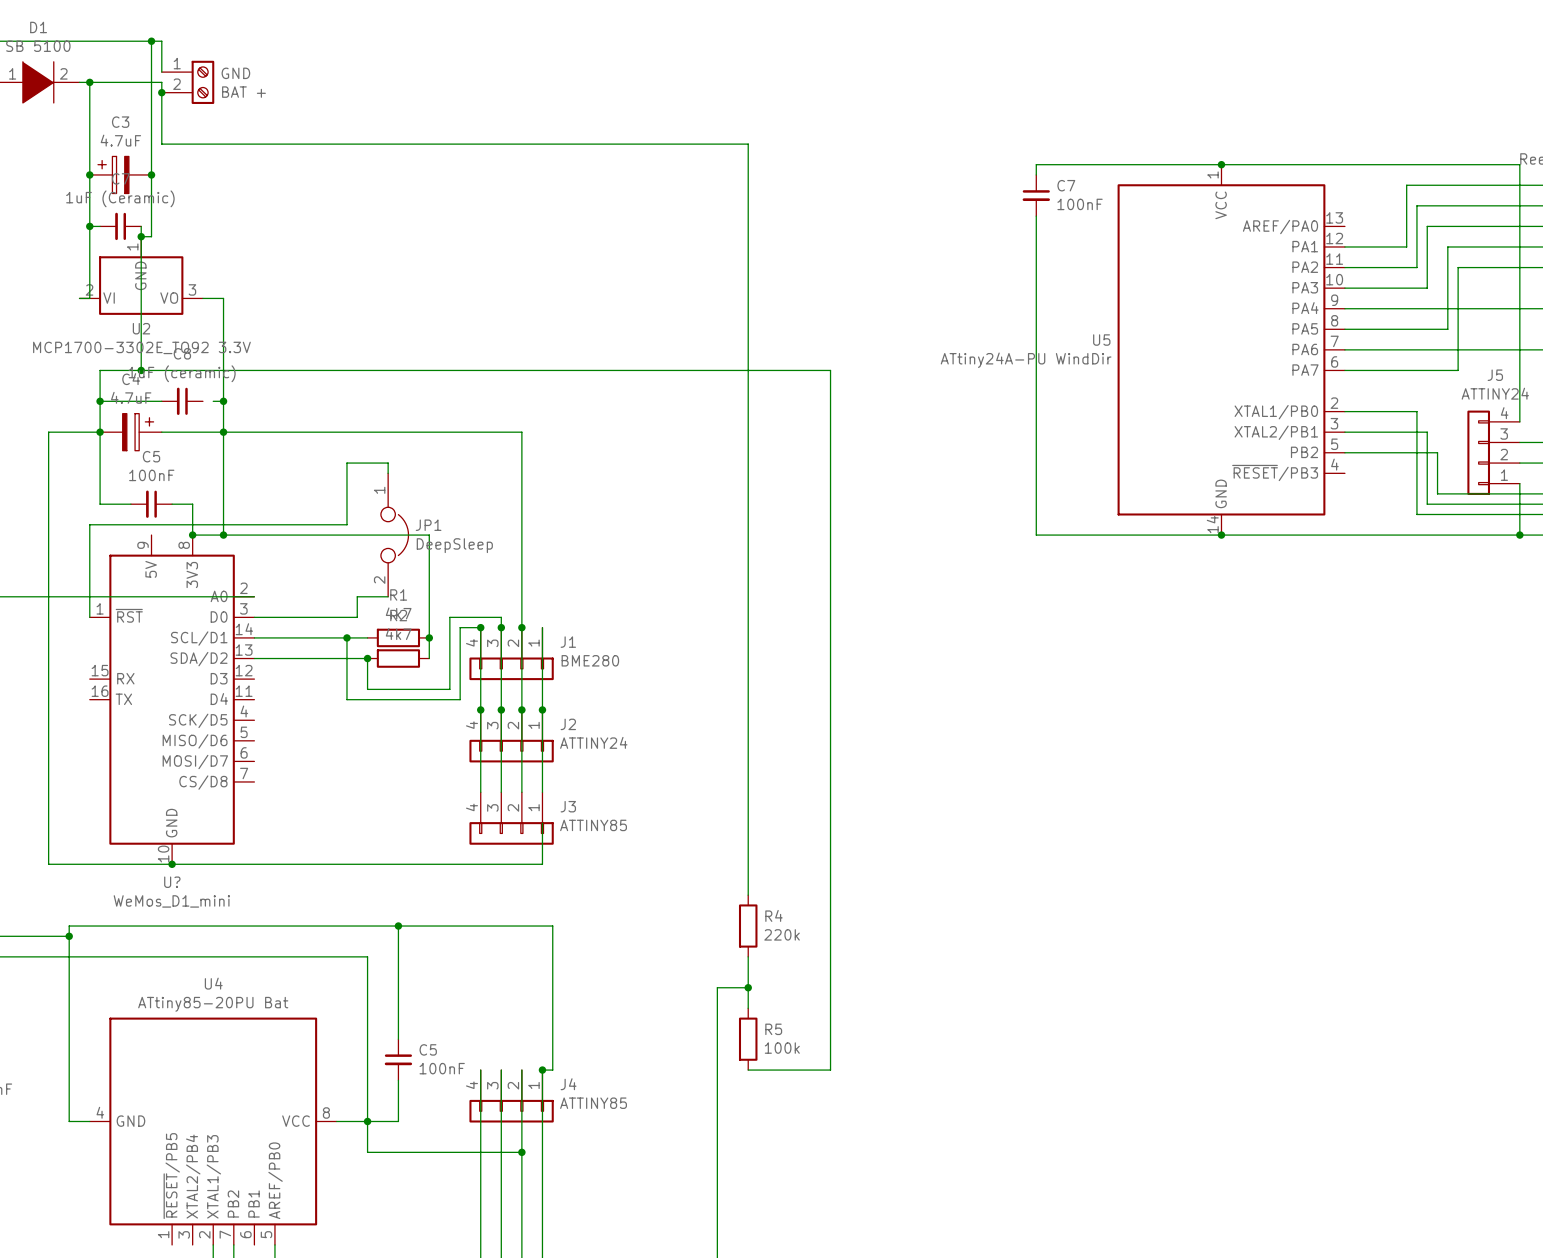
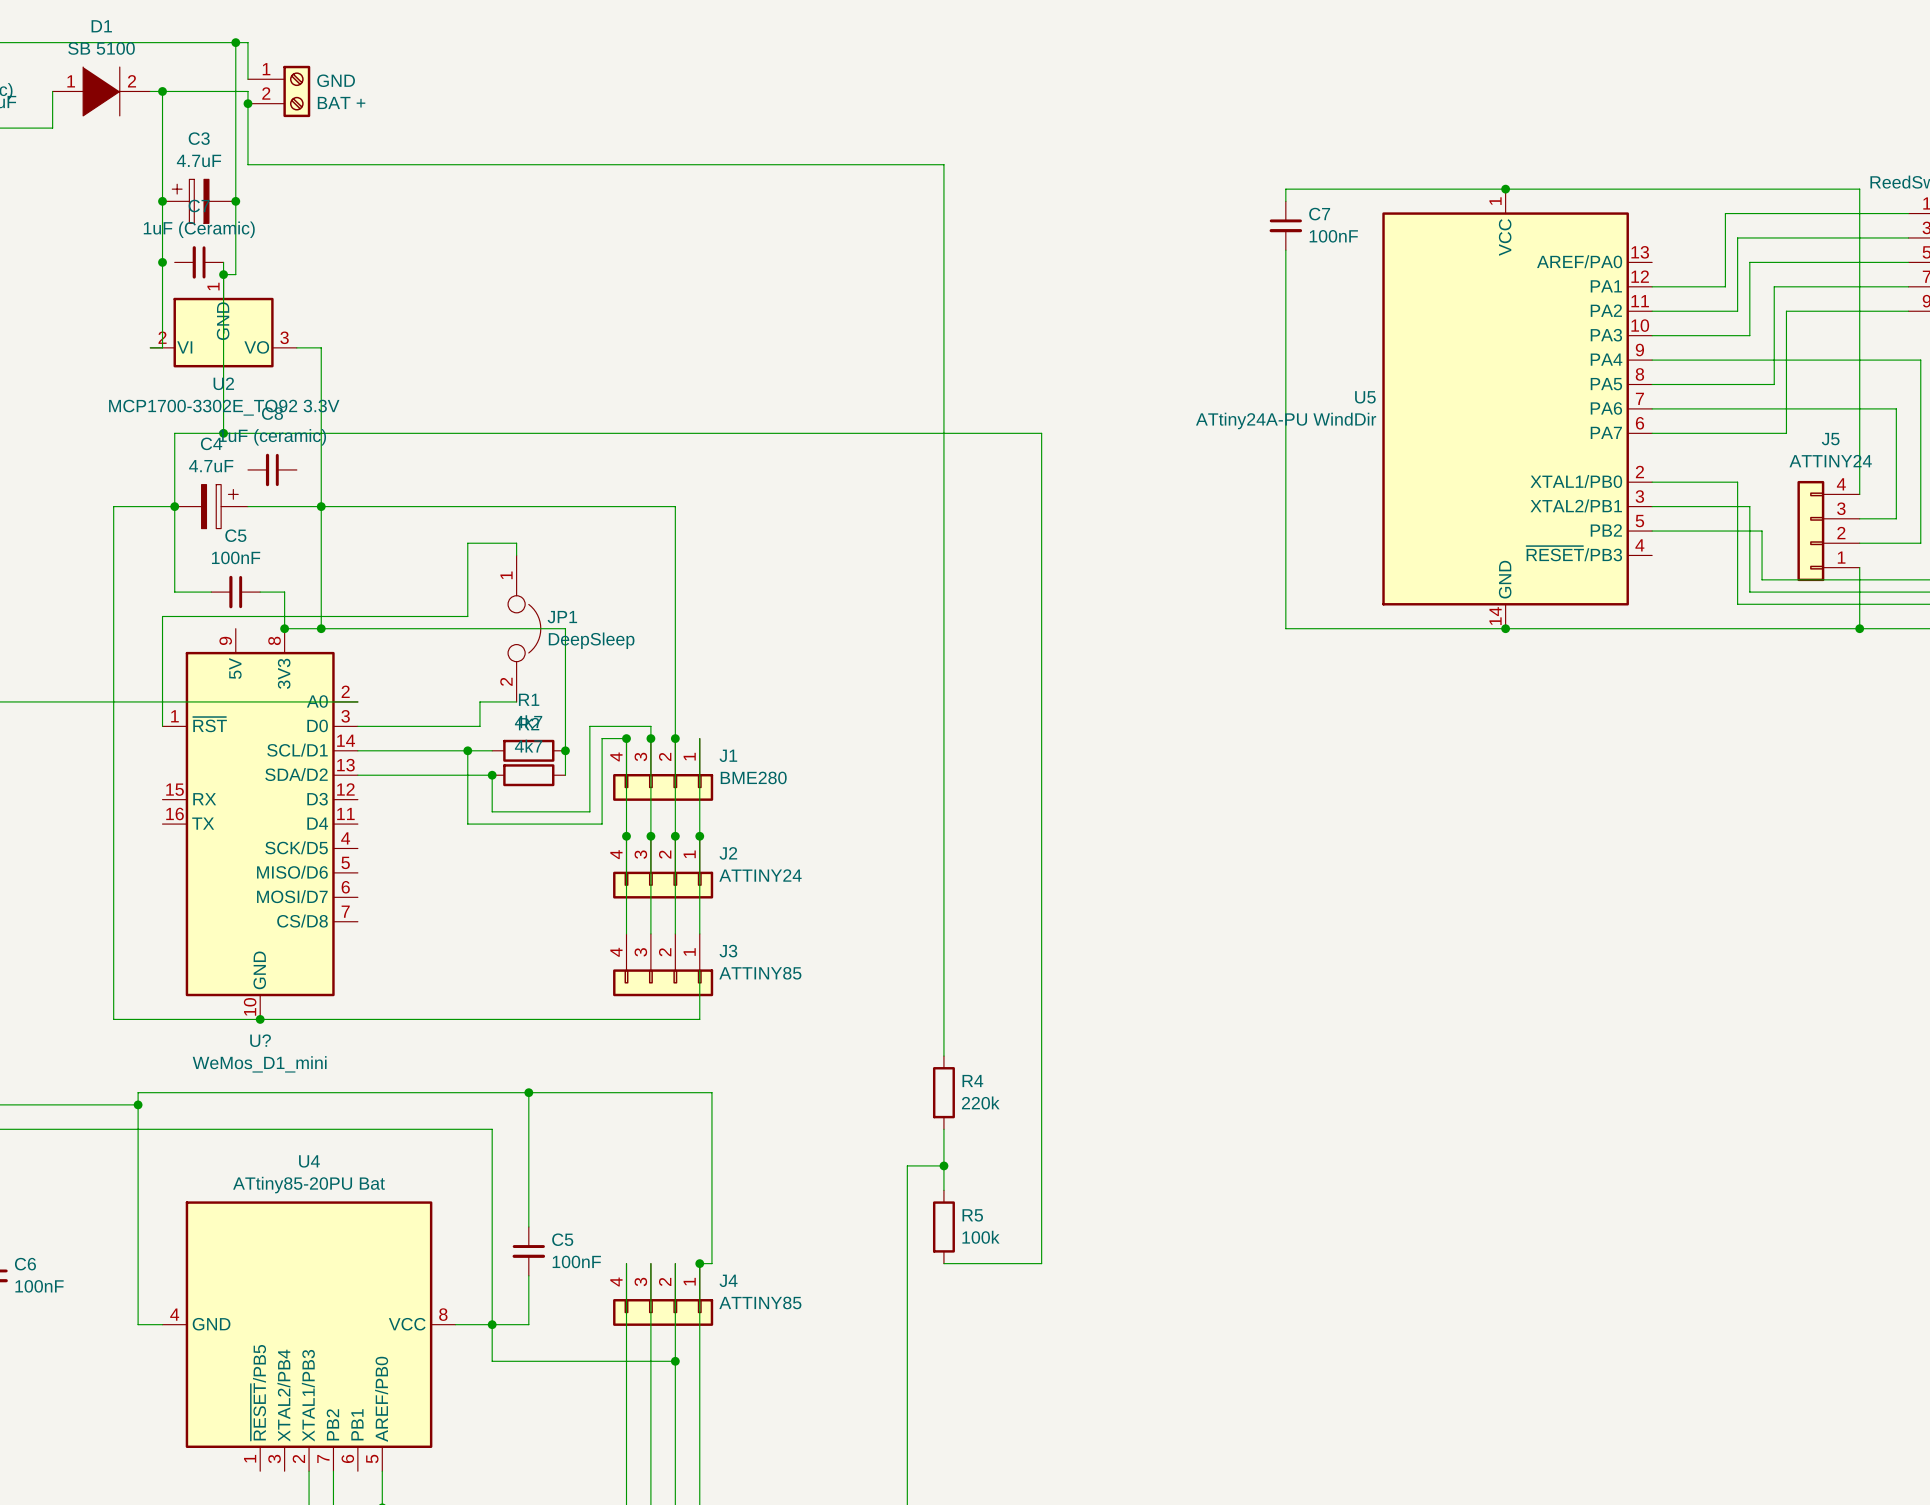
wire: (89, 226) (100, 226) -> none
wire: (100, 401) (161, 401) -> none
junction: (100, 401) -> none
wire: (213, 401) (223, 401) -> none
junction: (223, 401) -> none

